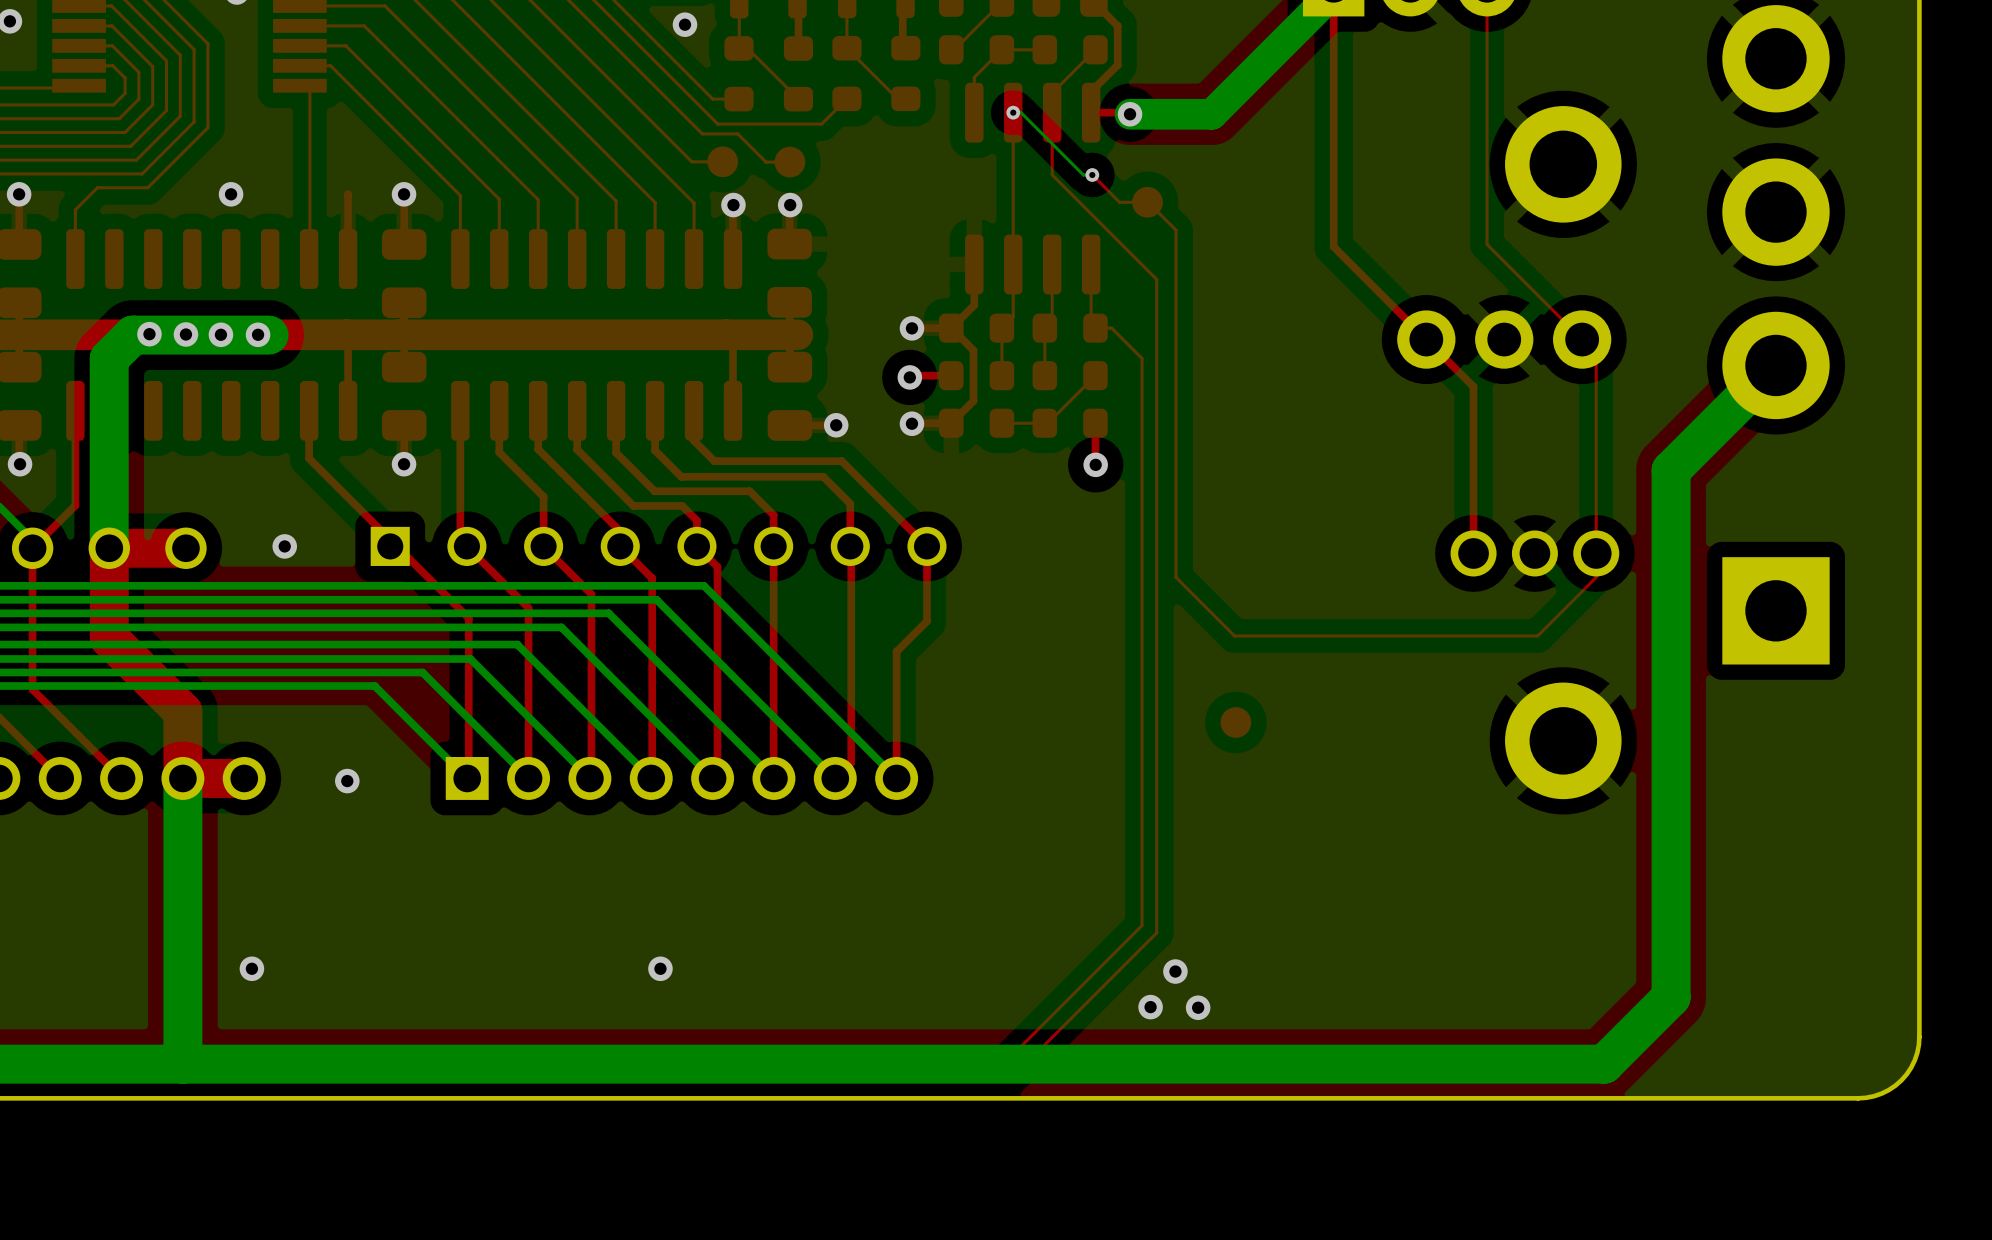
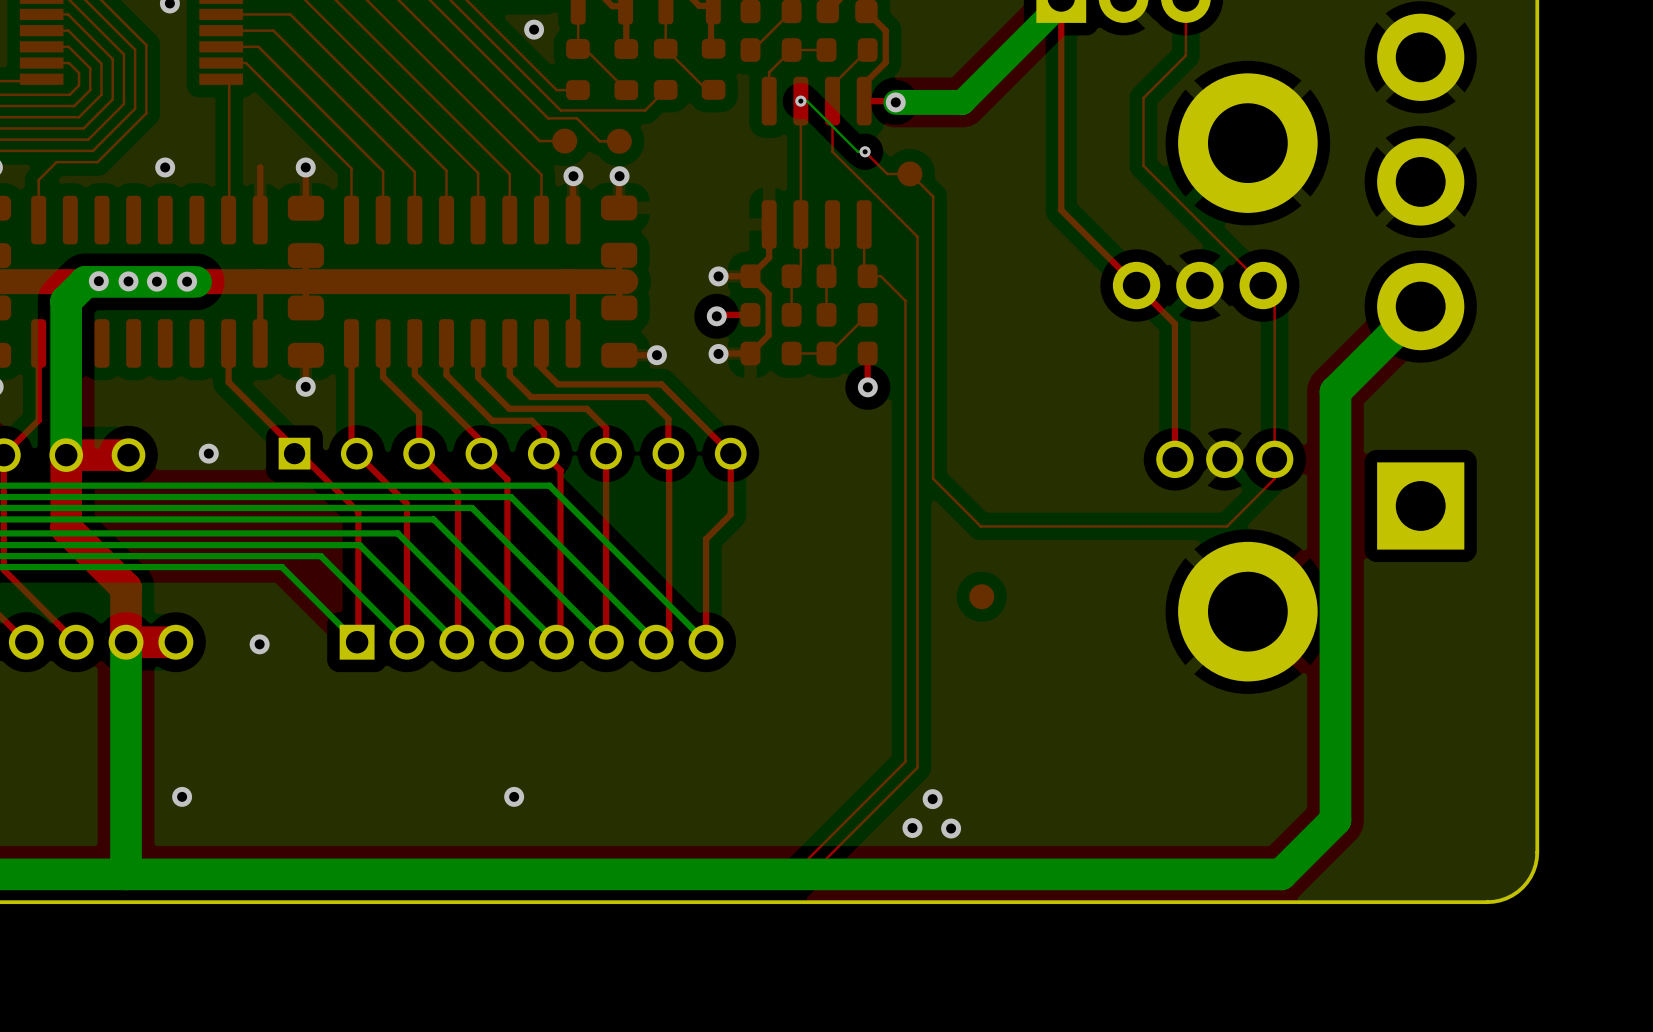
top track: (1487, 56) (1487, 244) -> (1185, 55) (1143, 98) (1143, 165) (1185, 208)
part footprint: [1505, 106, 1622, 223] -> [1178, 73, 1318, 213]
part footprint: [1505, 682, 1622, 800] -> [1178, 541, 1318, 682]

